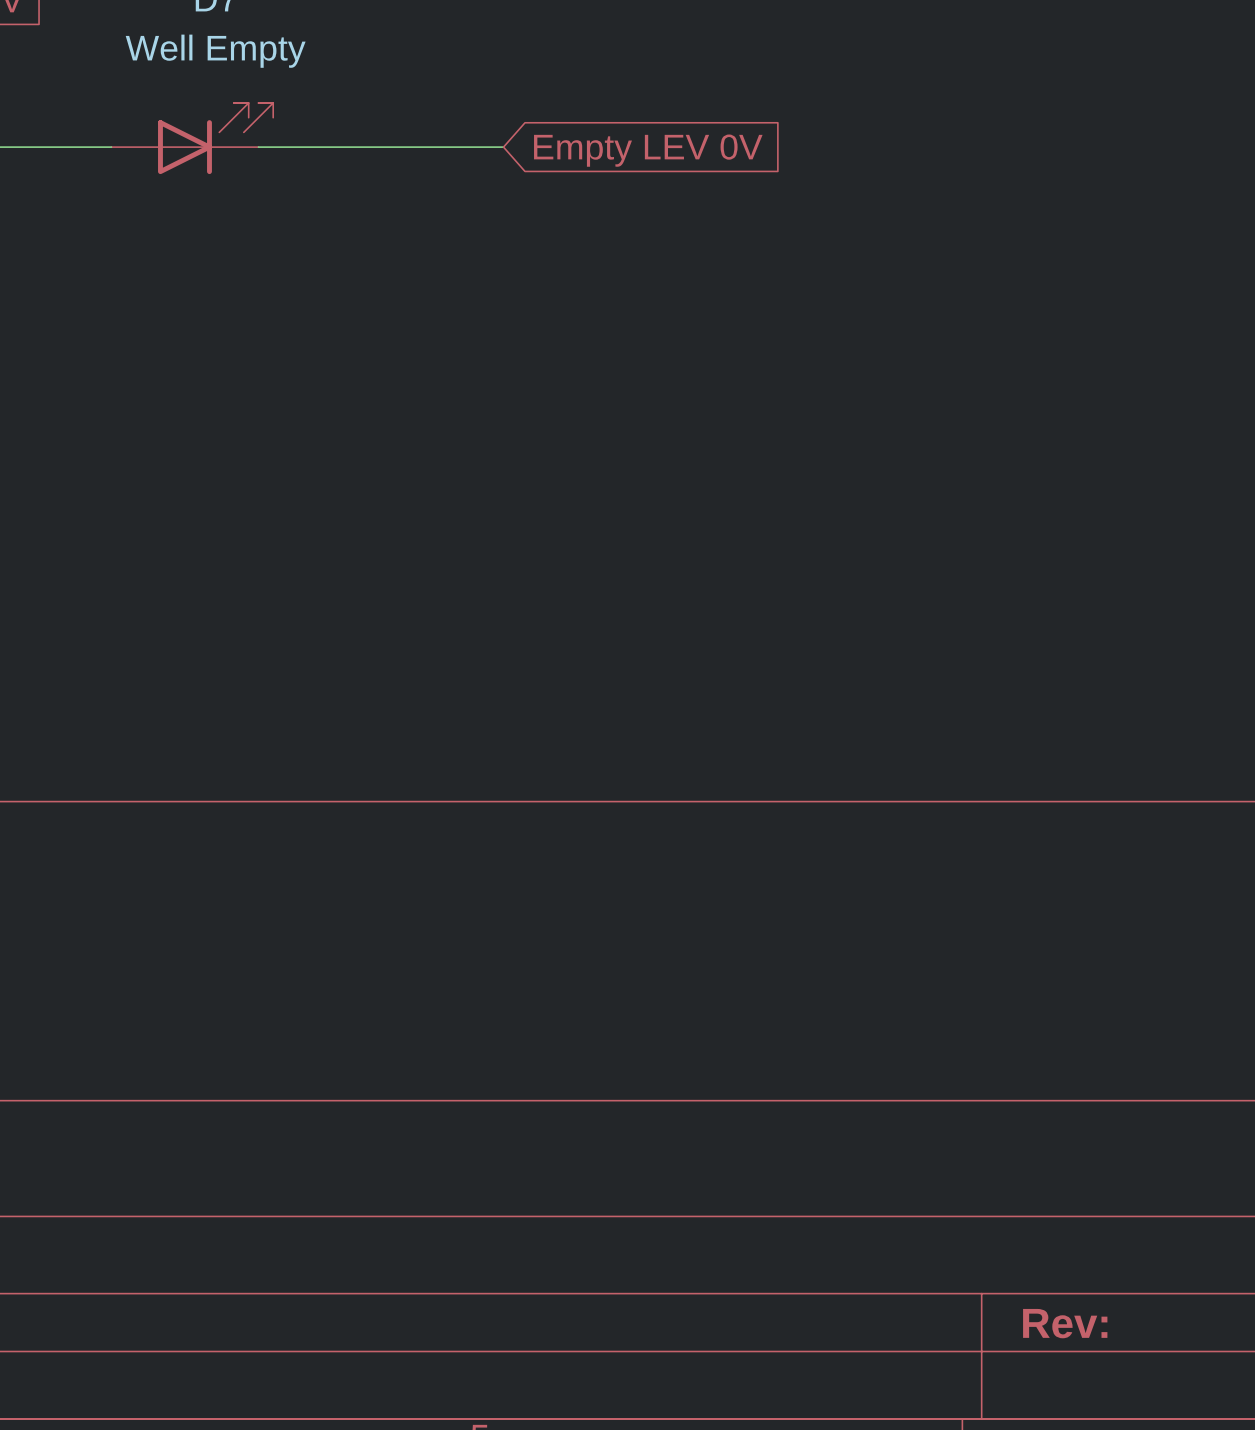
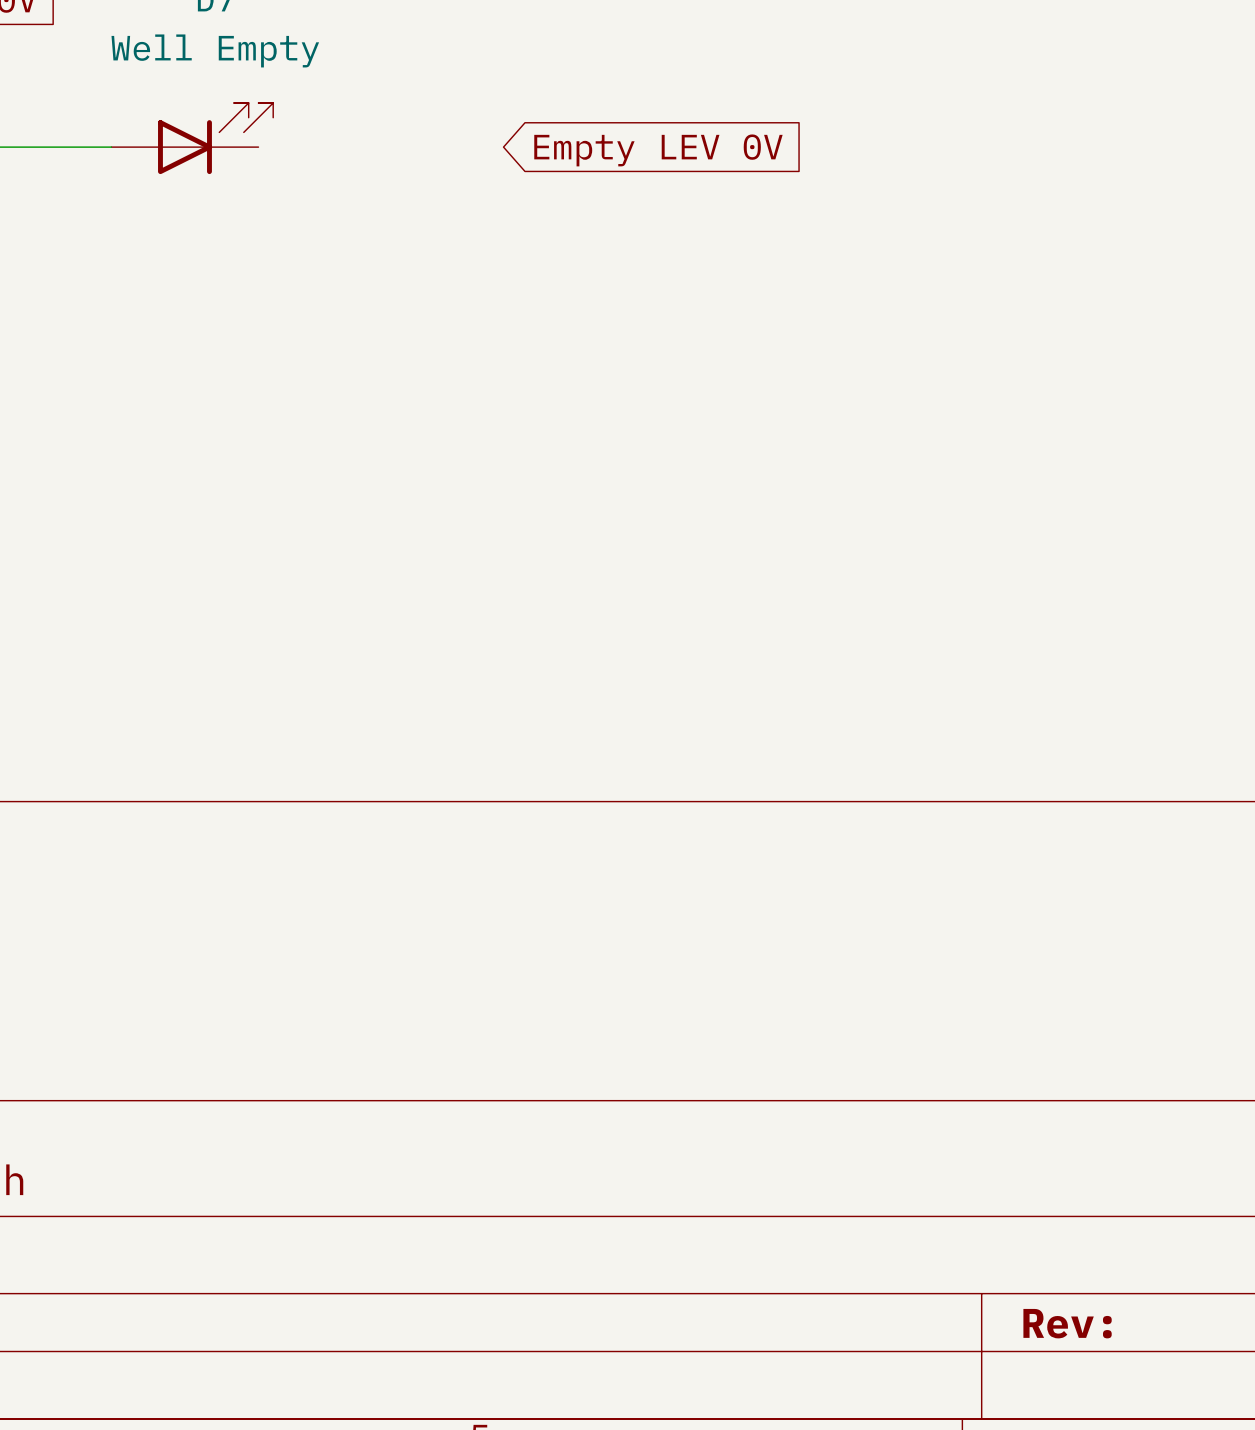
wire: (258, 147) (503, 147) -> none

